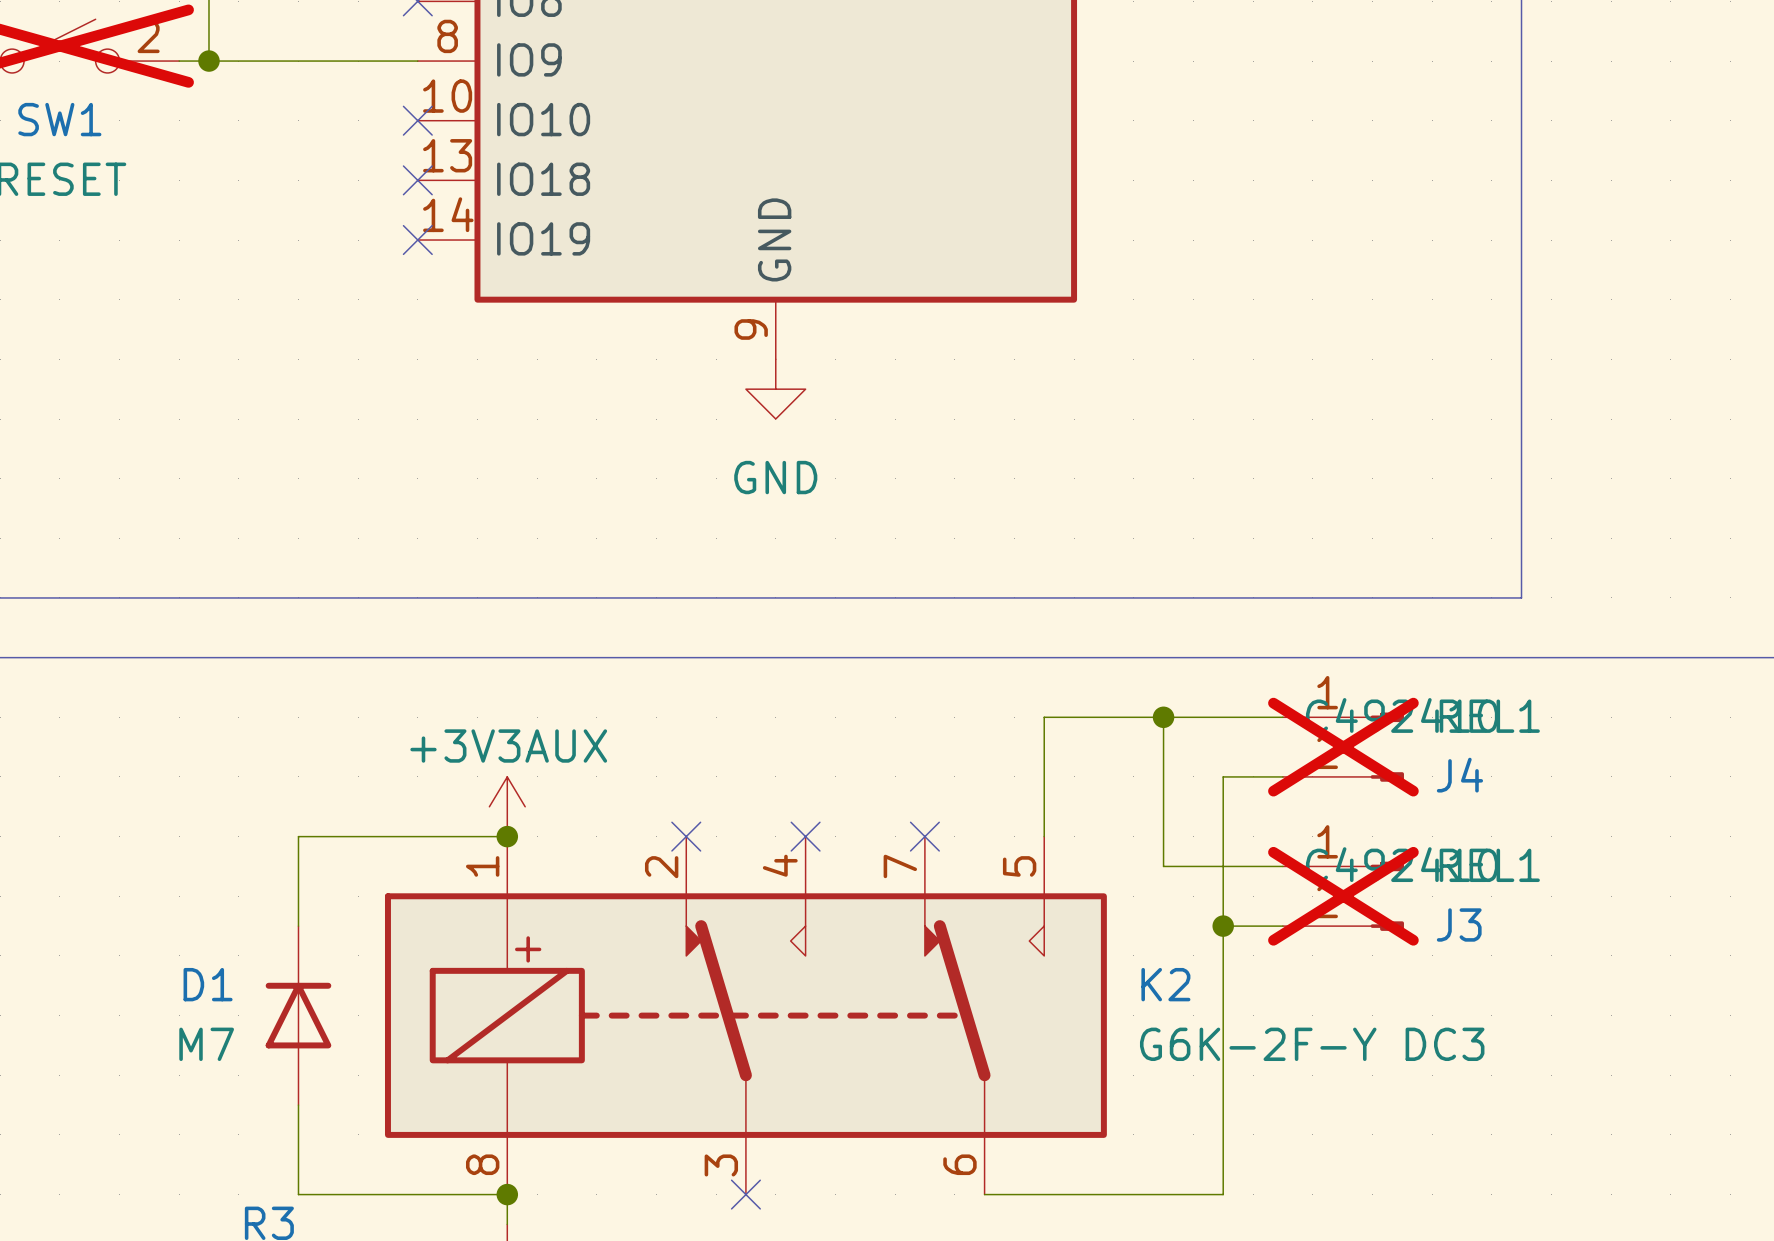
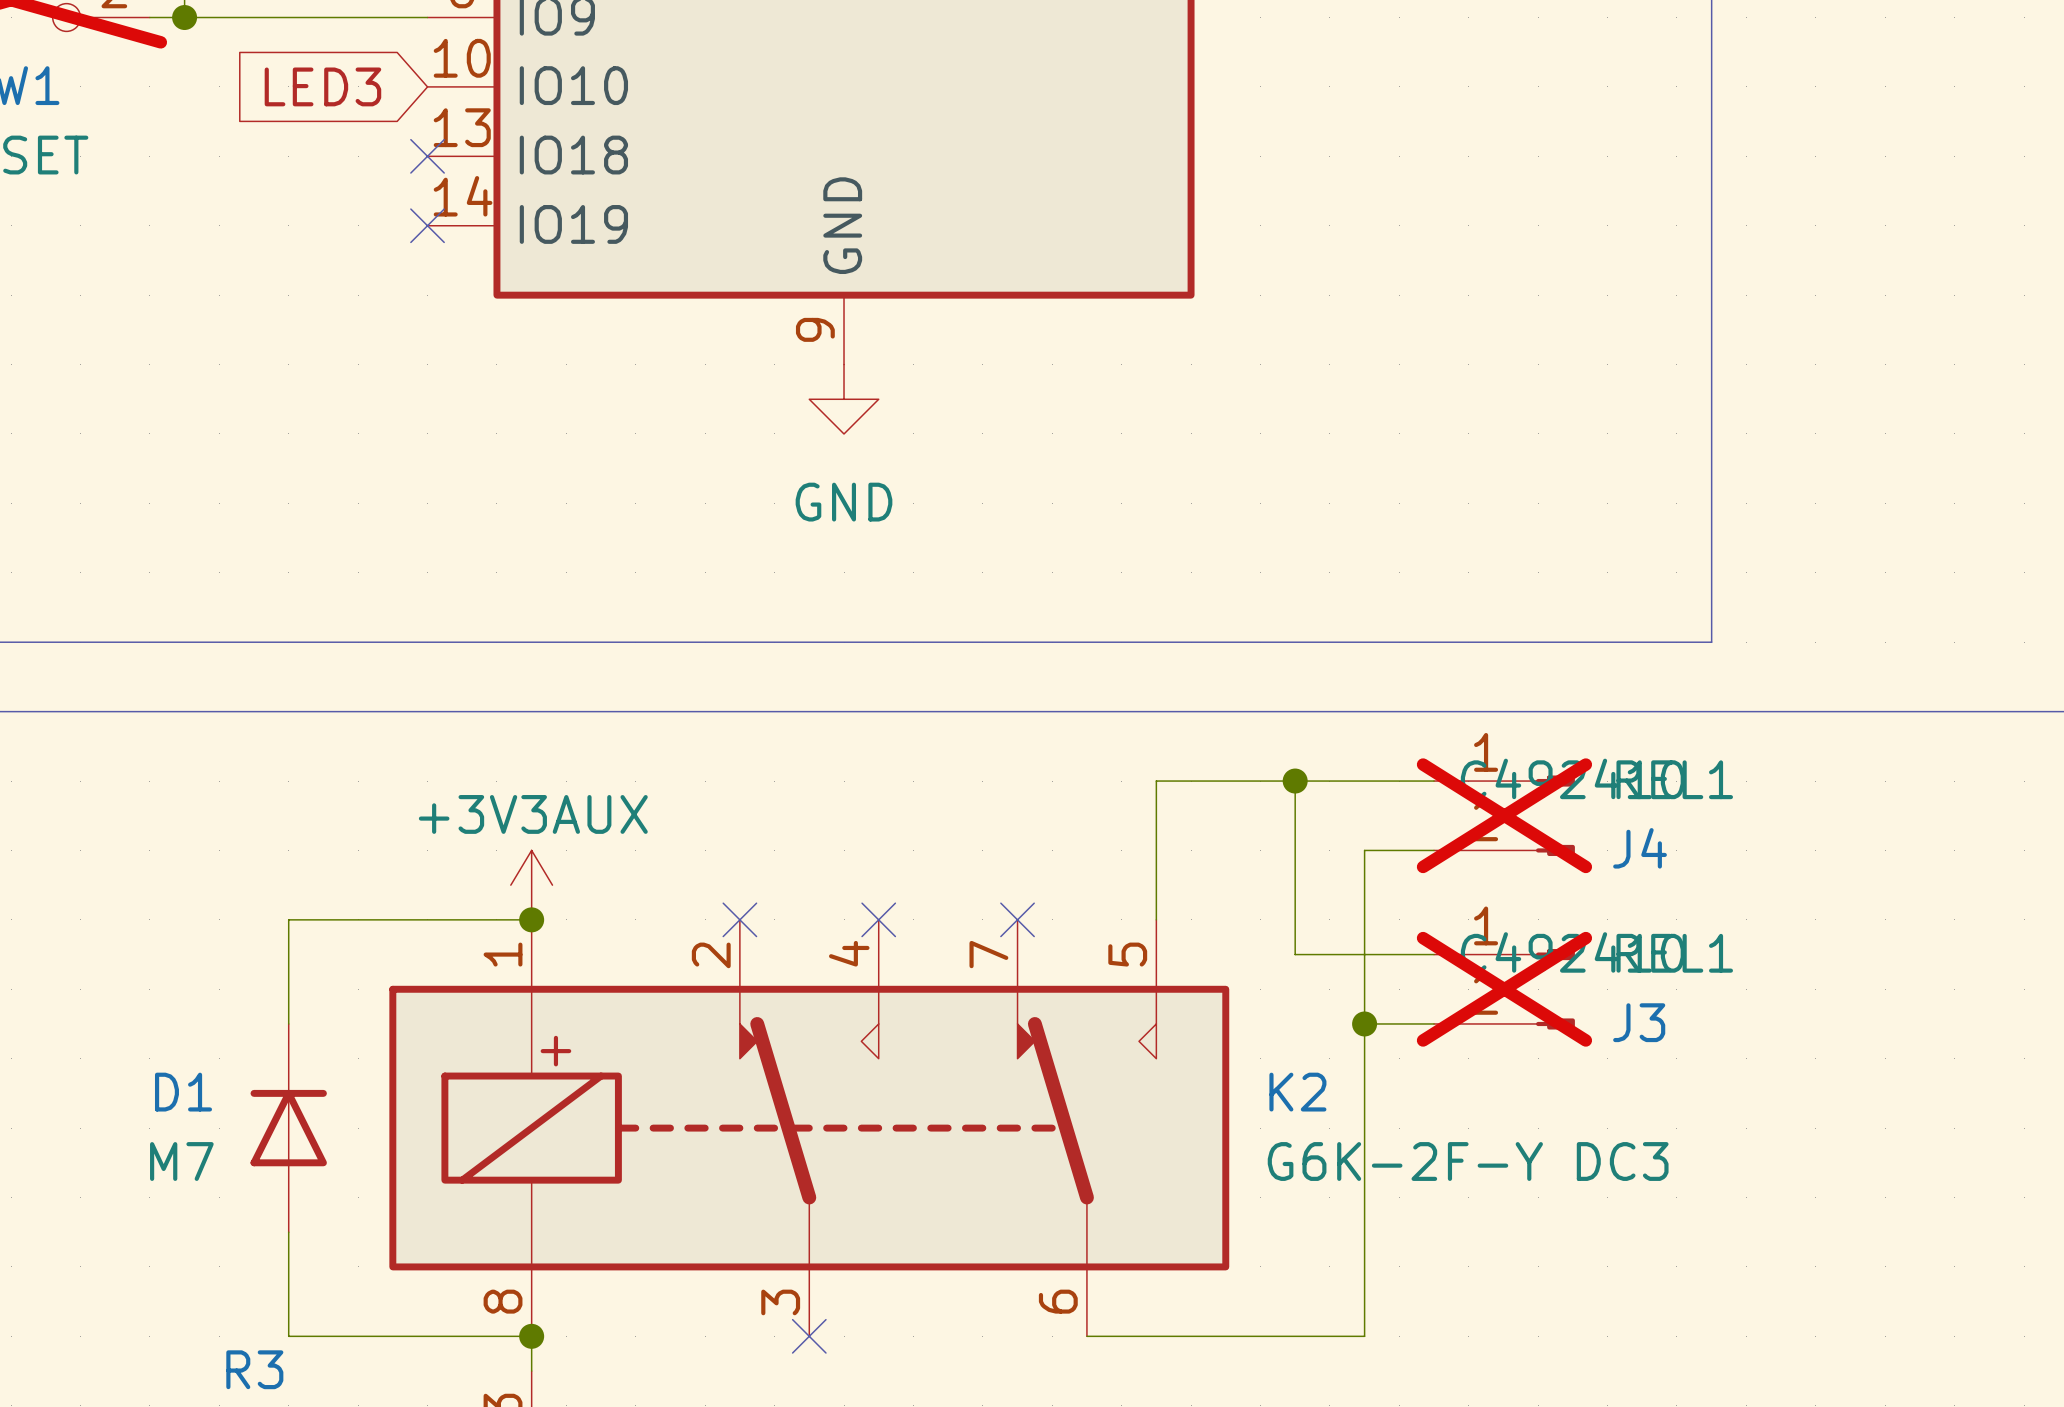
global label: none -> LED3 (322, 86)
no-connect mark: (417, 120) -> none

